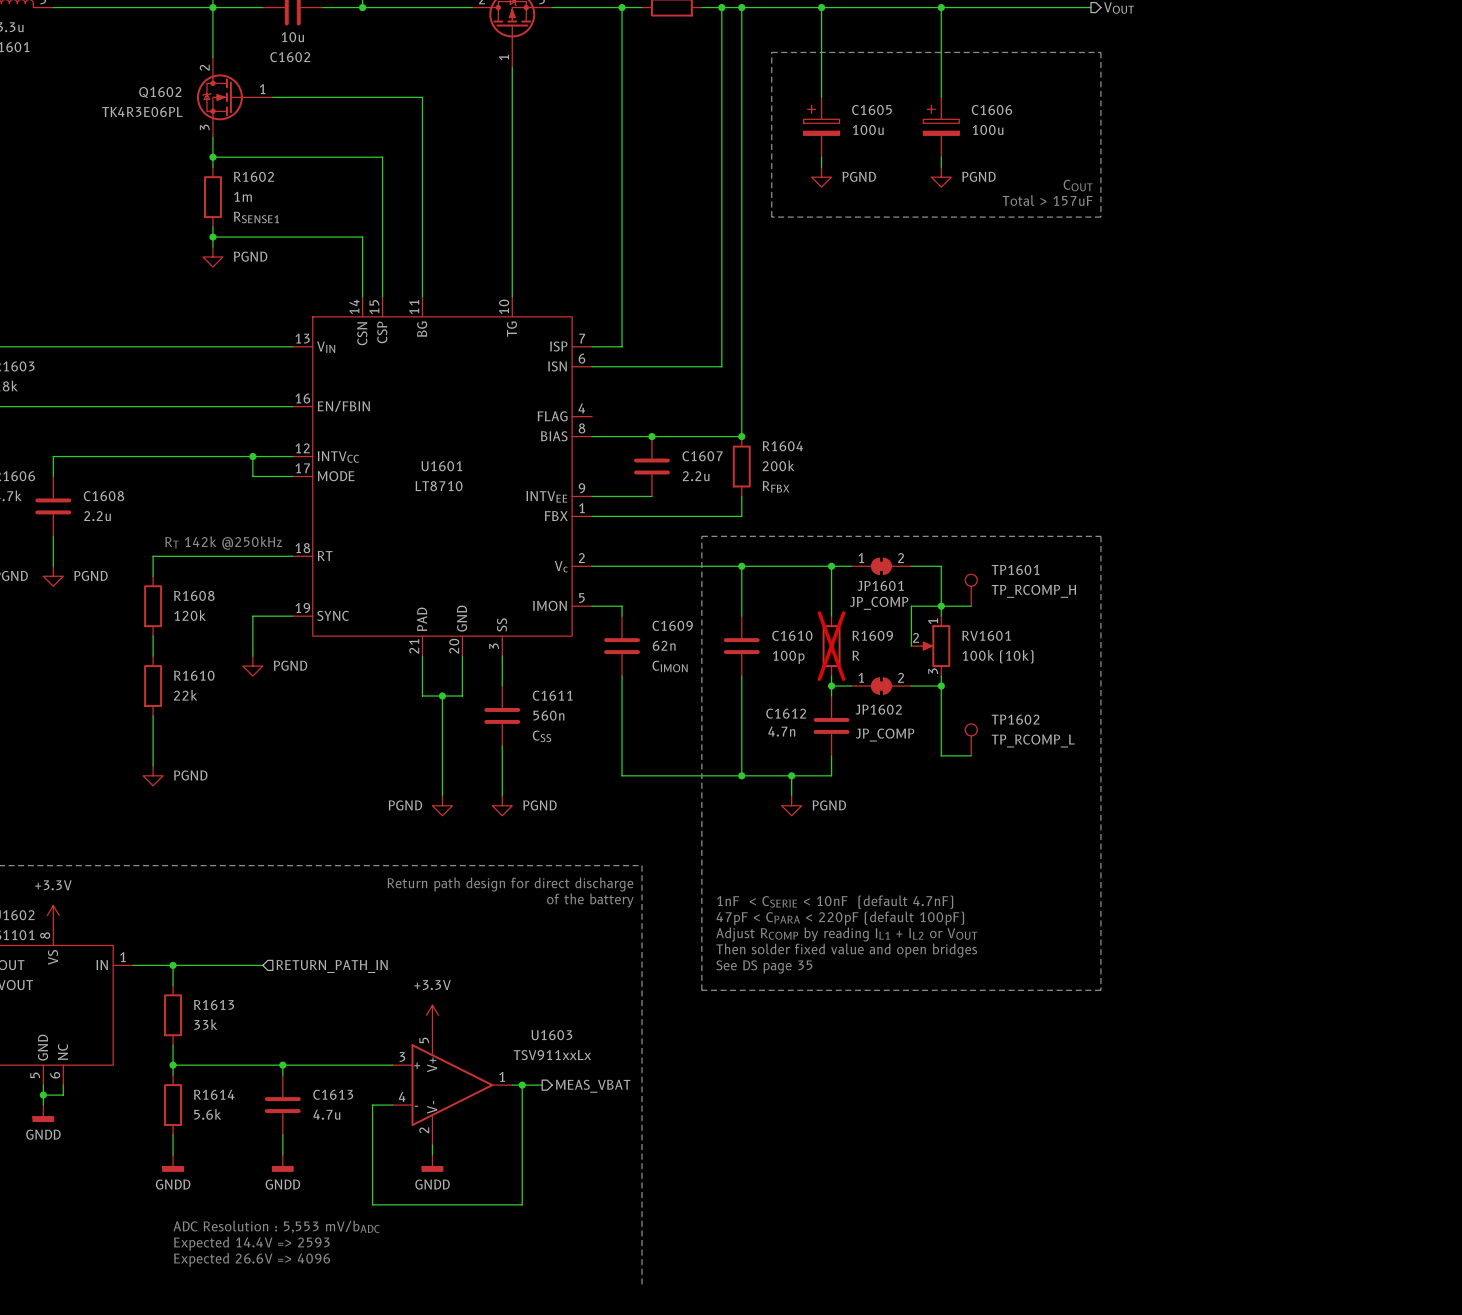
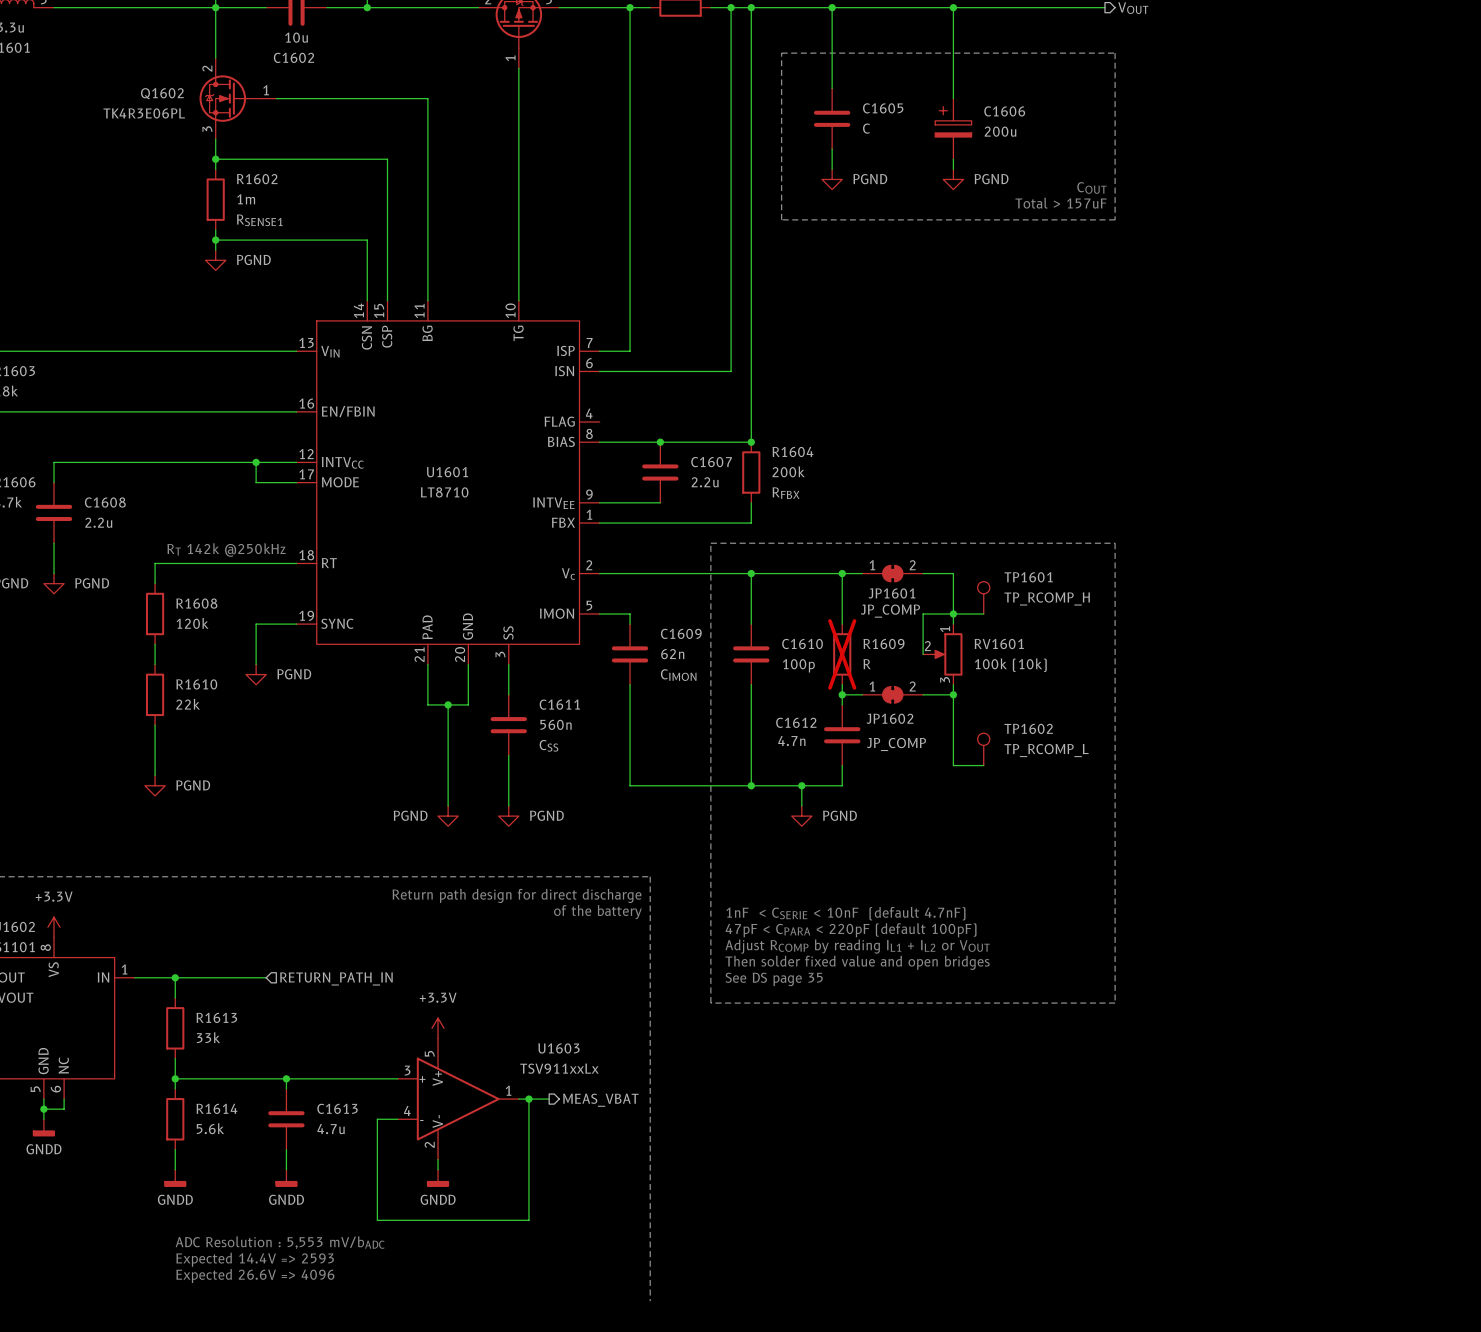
C1605 symbol: [803, 97, 840, 158] -> [813, 88, 851, 150]
C1605 value: 100u (868, 129) -> C (866, 128)
C1606 value: 100u (987, 129) -> 200u (1000, 131)

